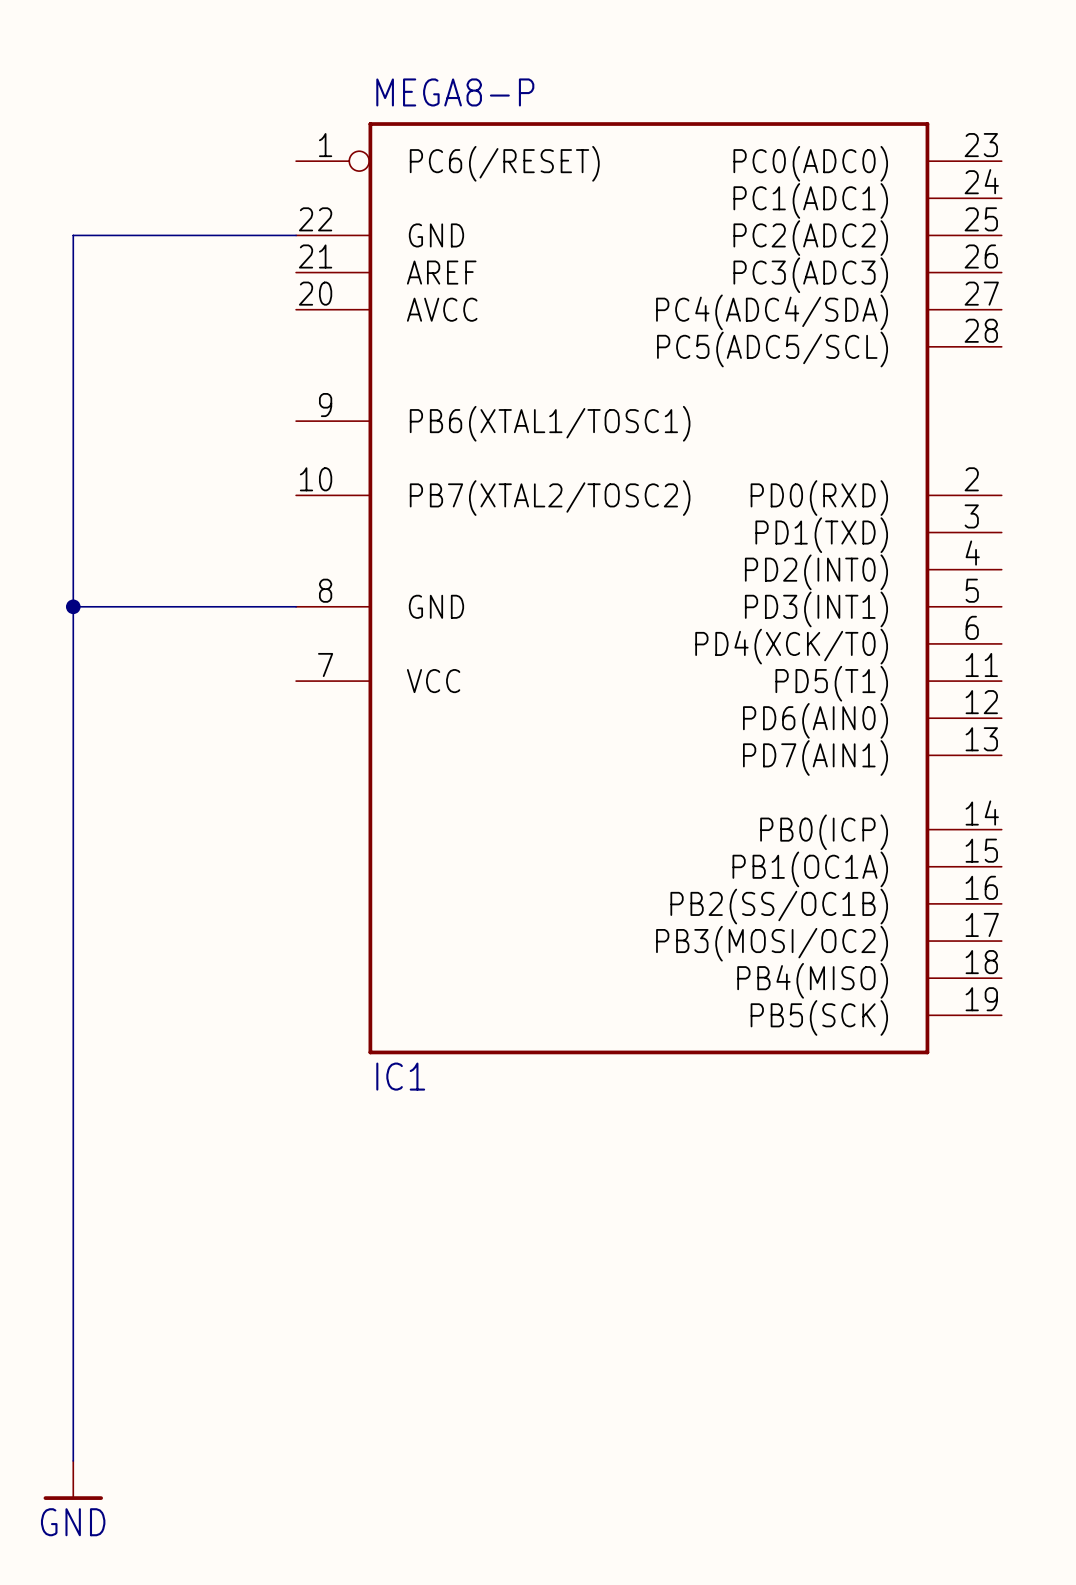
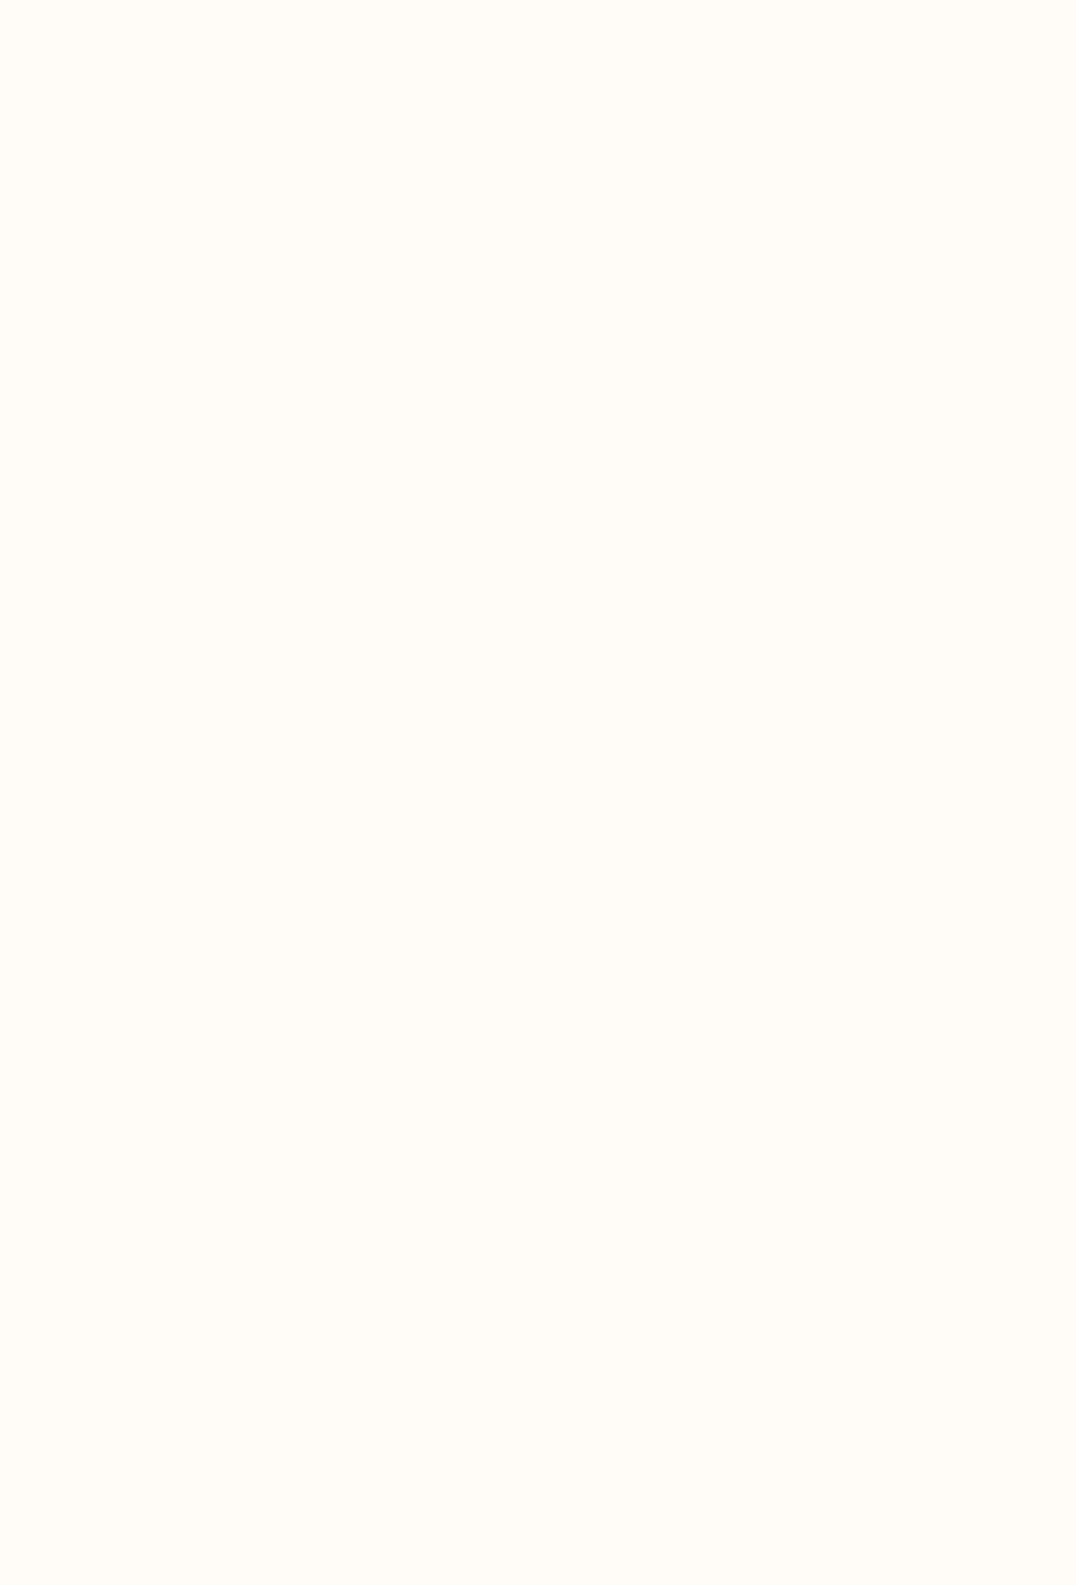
wire: (296, 235) (73, 235) (73, 1460) -> none
IC1: MEGA8-P (648, 588) -> none
wire: (73, 606) (296, 606) -> none
junction: (73, 606) -> none
power symbol: GND (73, 1480) -> none

